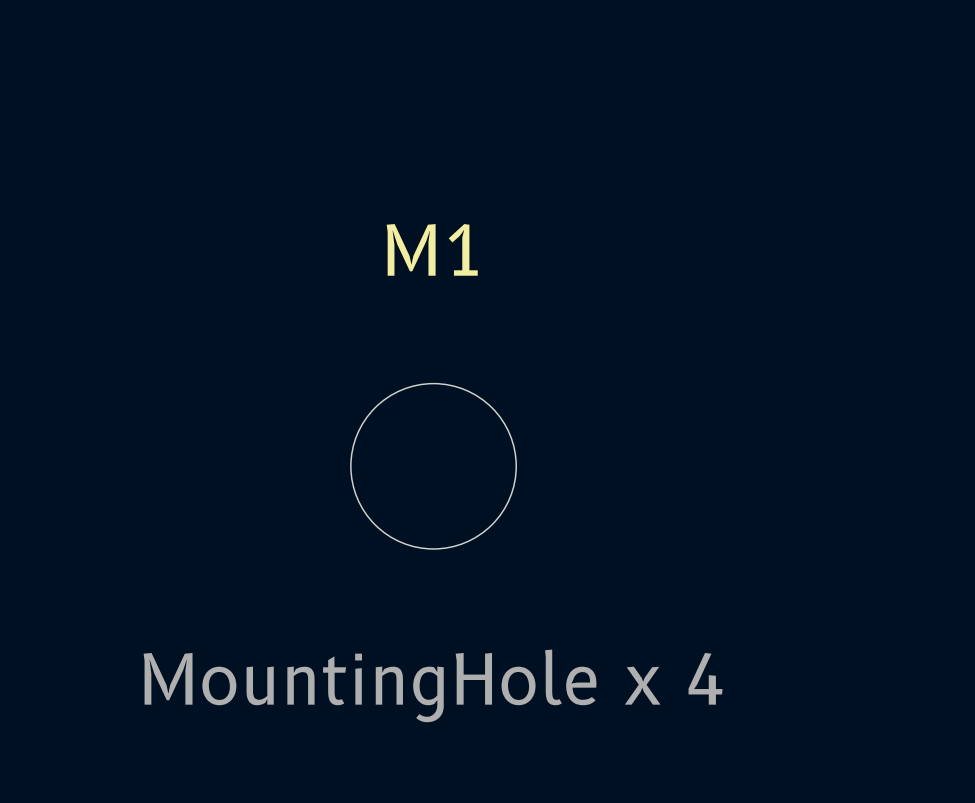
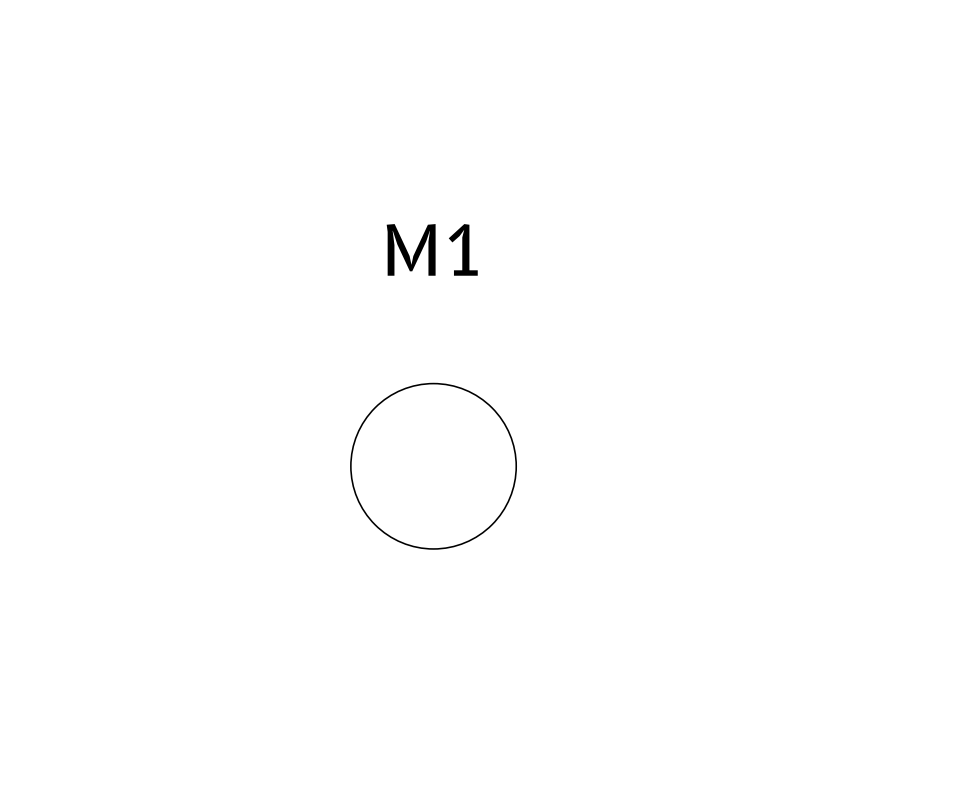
M1 value: MountingHole x 4 (433, 685) -> none

